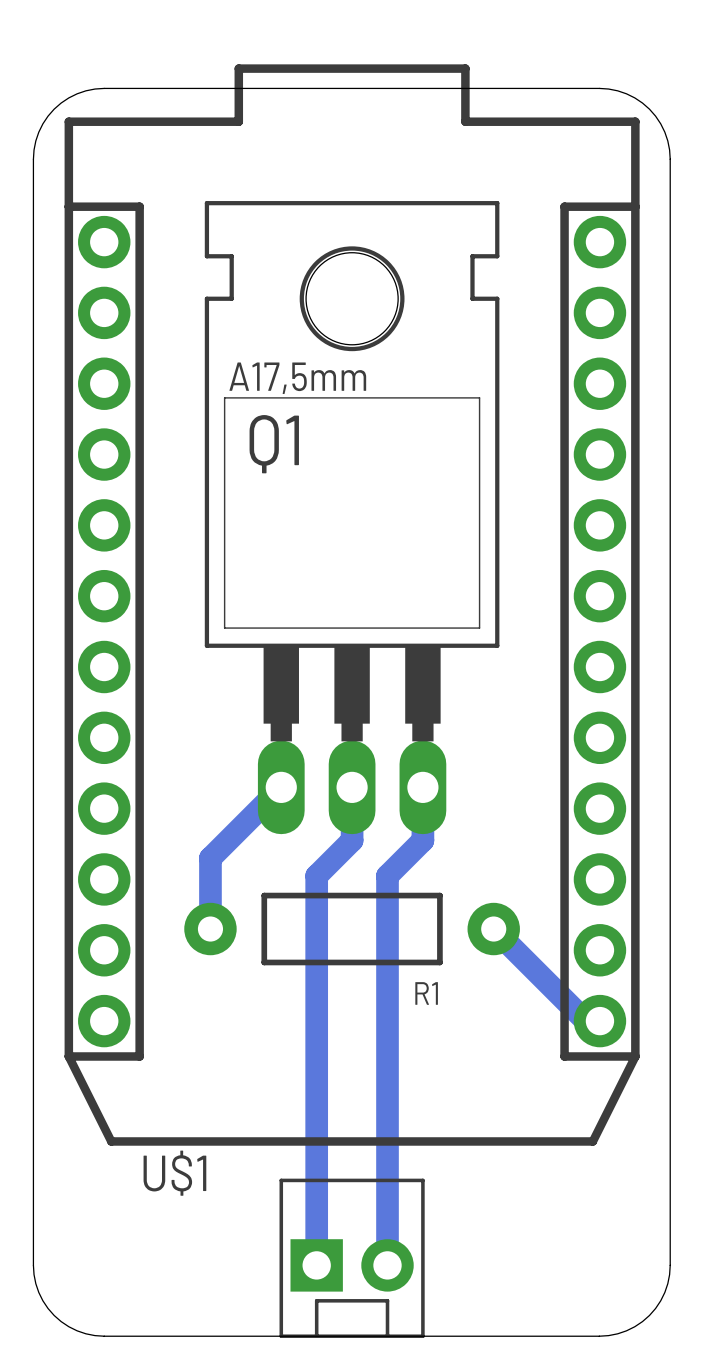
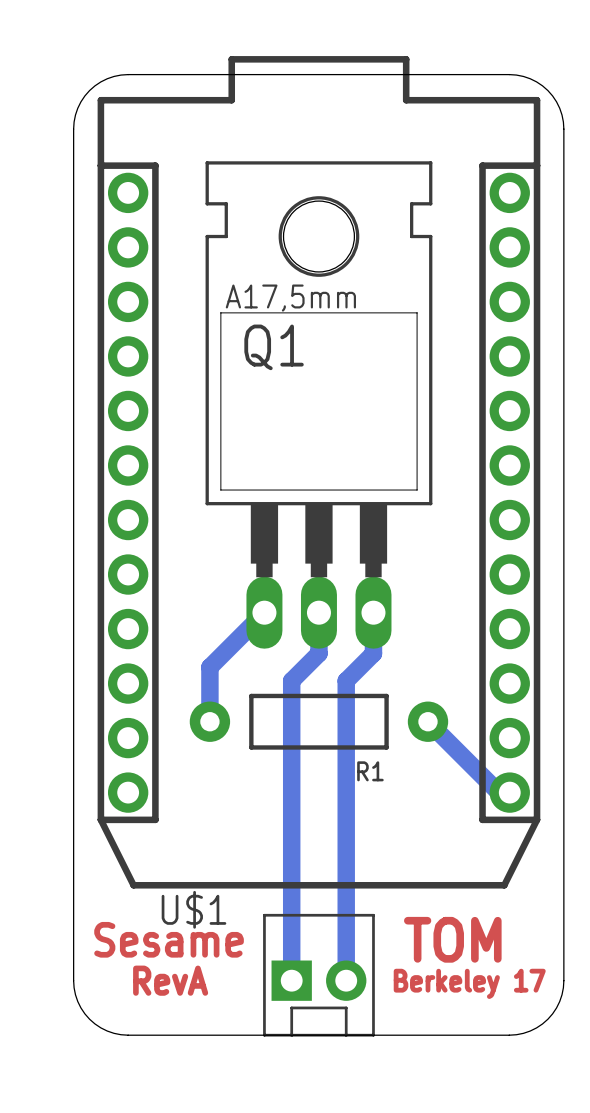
text: none -> Sesame (169, 939)
text: none -> TOM (452, 939)
text: none -> RevA (170, 980)
text: none -> Berkeley 17 (469, 983)

